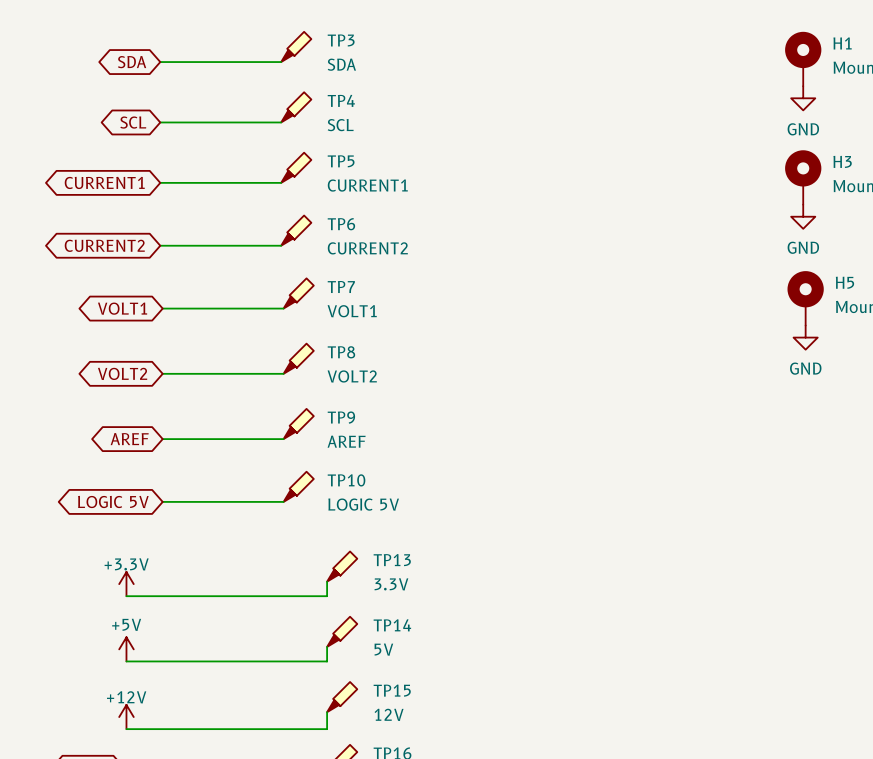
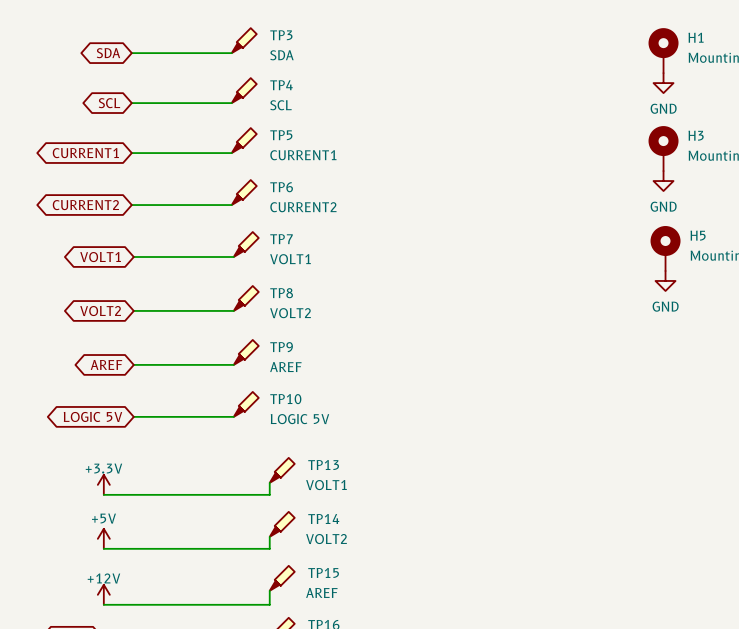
TP13 value: 3.3V (391, 584) -> VOLT1 (326, 485)
TP14 value: 5V (383, 649) -> VOLT2 (326, 539)
TP15 value: 12V (389, 714) -> AREF (321, 592)

